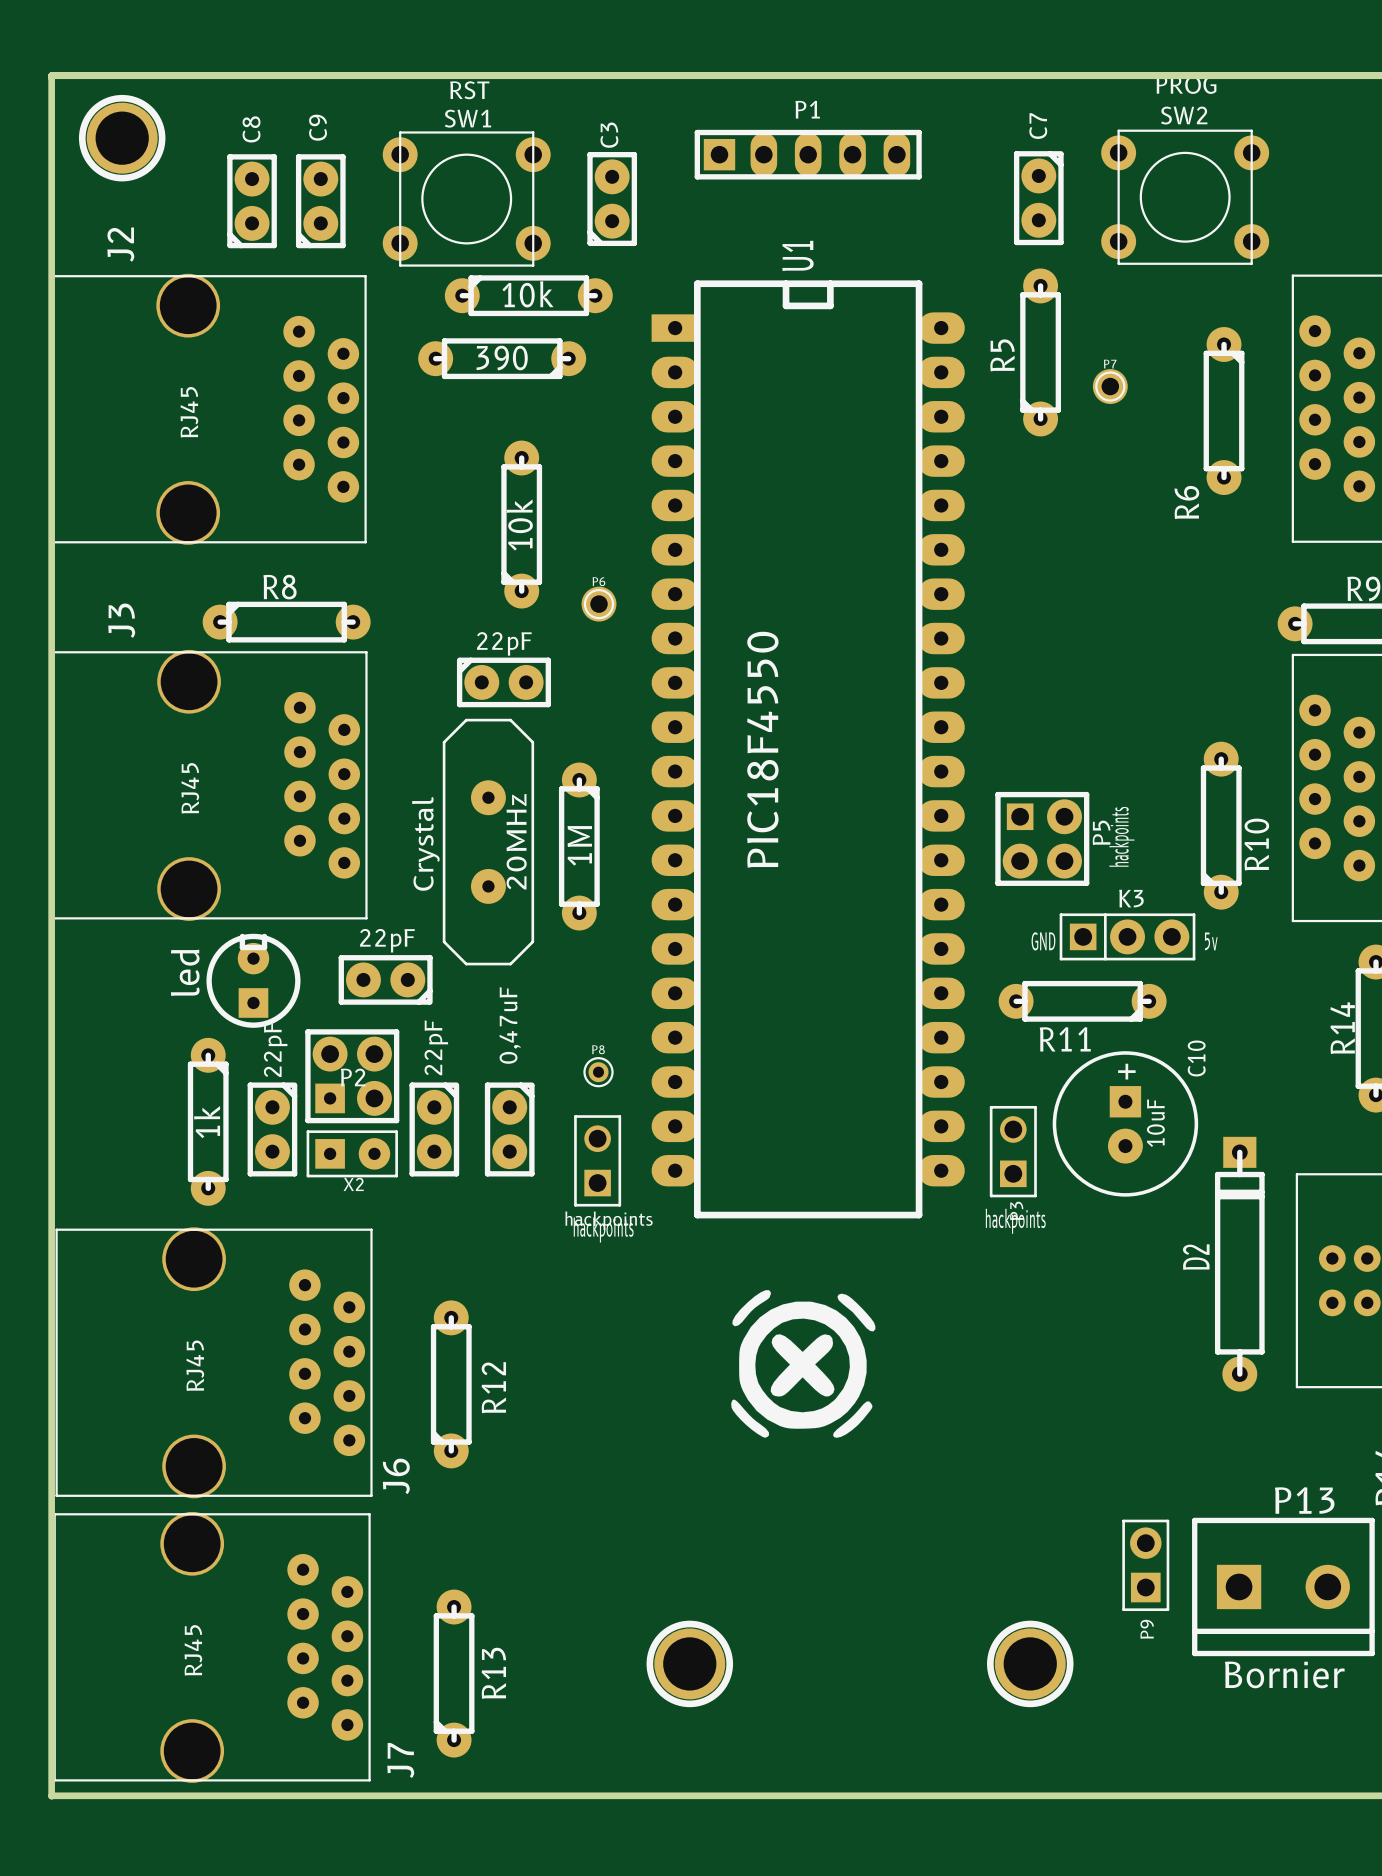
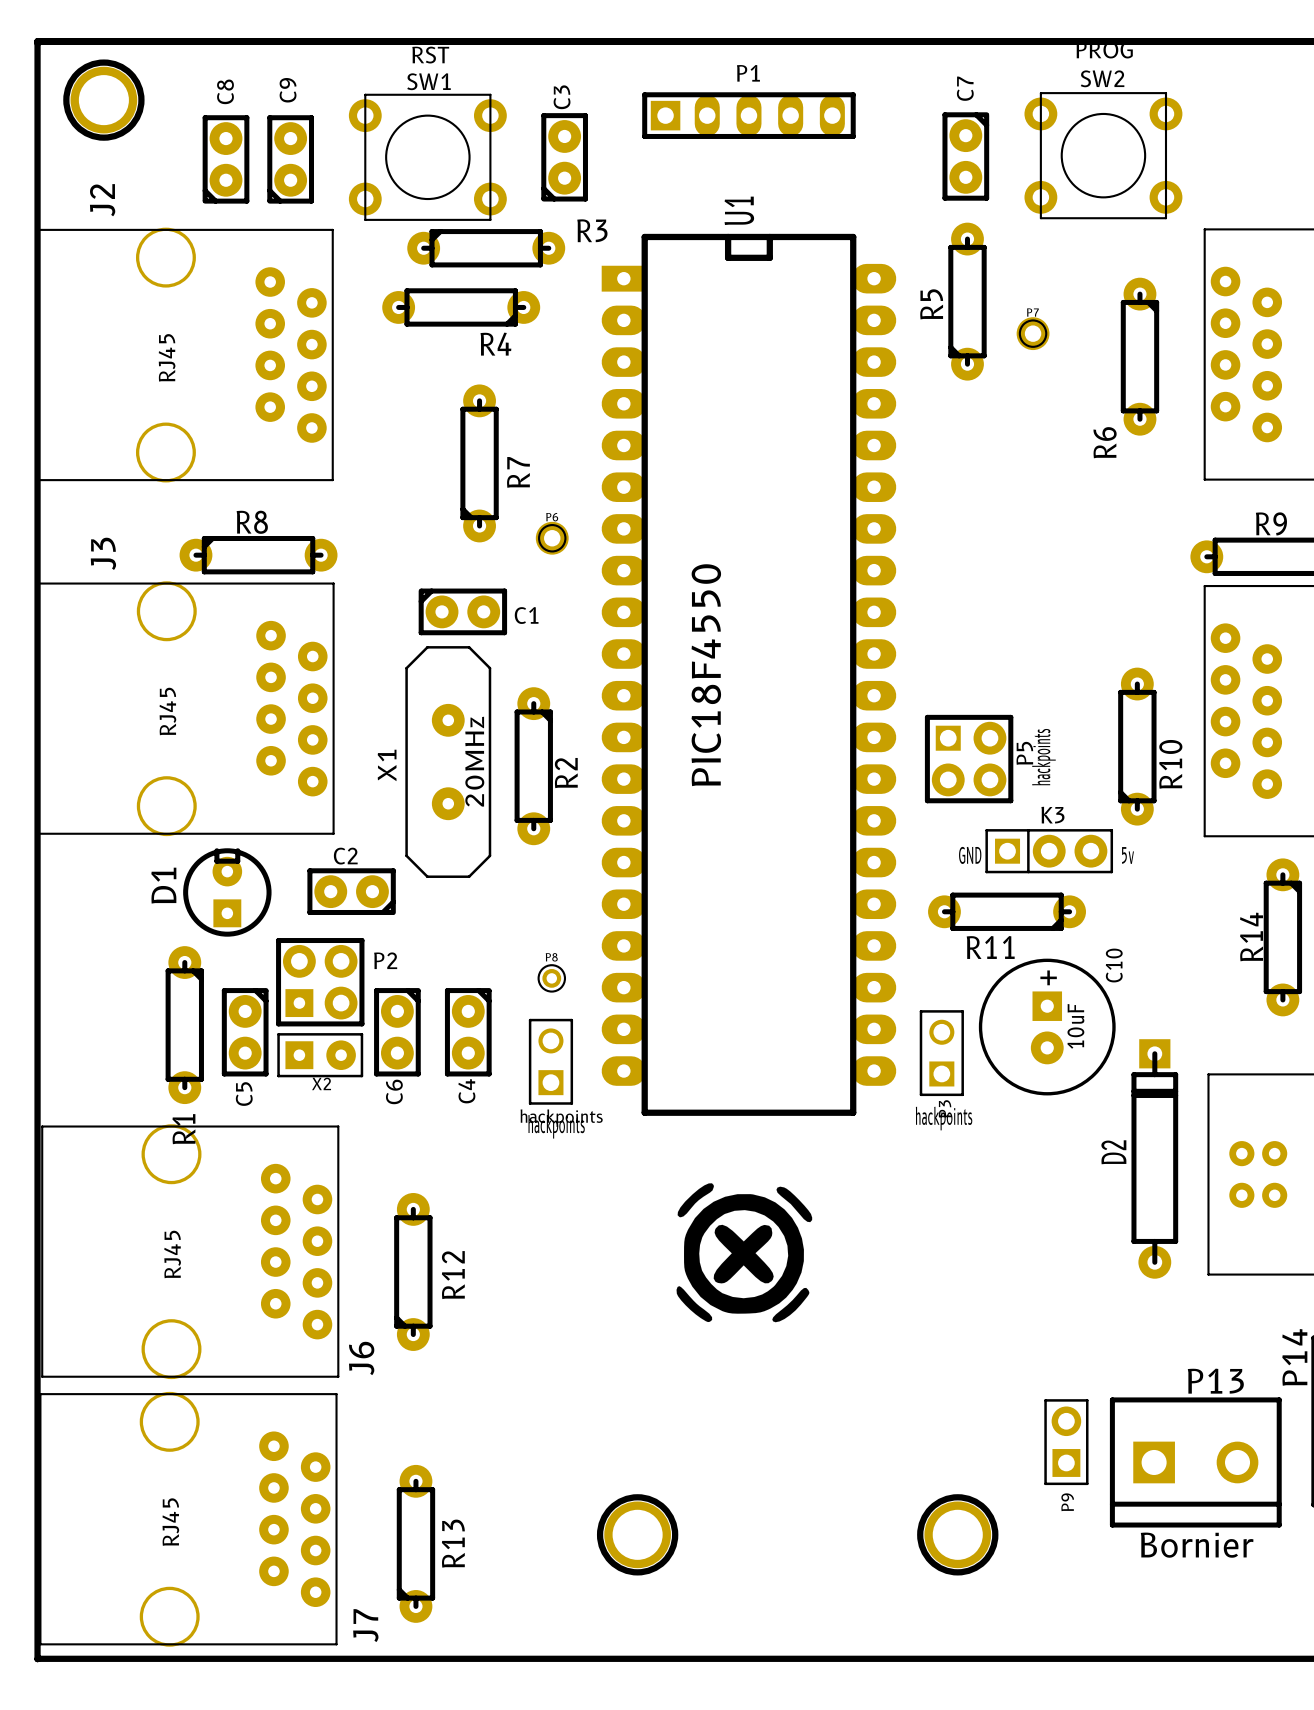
10k name: 10k (527, 294) -> R3 (592, 230)
390 name: 390 (502, 358) -> R4 (495, 344)
10k name: 10k (519, 524) -> R7 (518, 472)
22pF name: 22pF (504, 643) -> C1 (526, 615)
Crystal name: Crystal (425, 843) -> X1 (387, 765)
1M name: 1M (579, 845) -> R2 (566, 773)
22pF name: 22pF (387, 940) -> C2 (345, 856)
led name: led (185, 972) -> D1 (163, 885)
0,47uF name: 0,47uF (510, 1025) -> C4 (466, 1091)
22pF name: 22pF (436, 1047) -> C6 (394, 1091)
22pF name: 22pF (275, 1049) -> C5 (244, 1094)
P2 name position: P2 (353, 1077) -> P2 (385, 960)
1k name: 1k (207, 1122) -> R1 (183, 1129)

